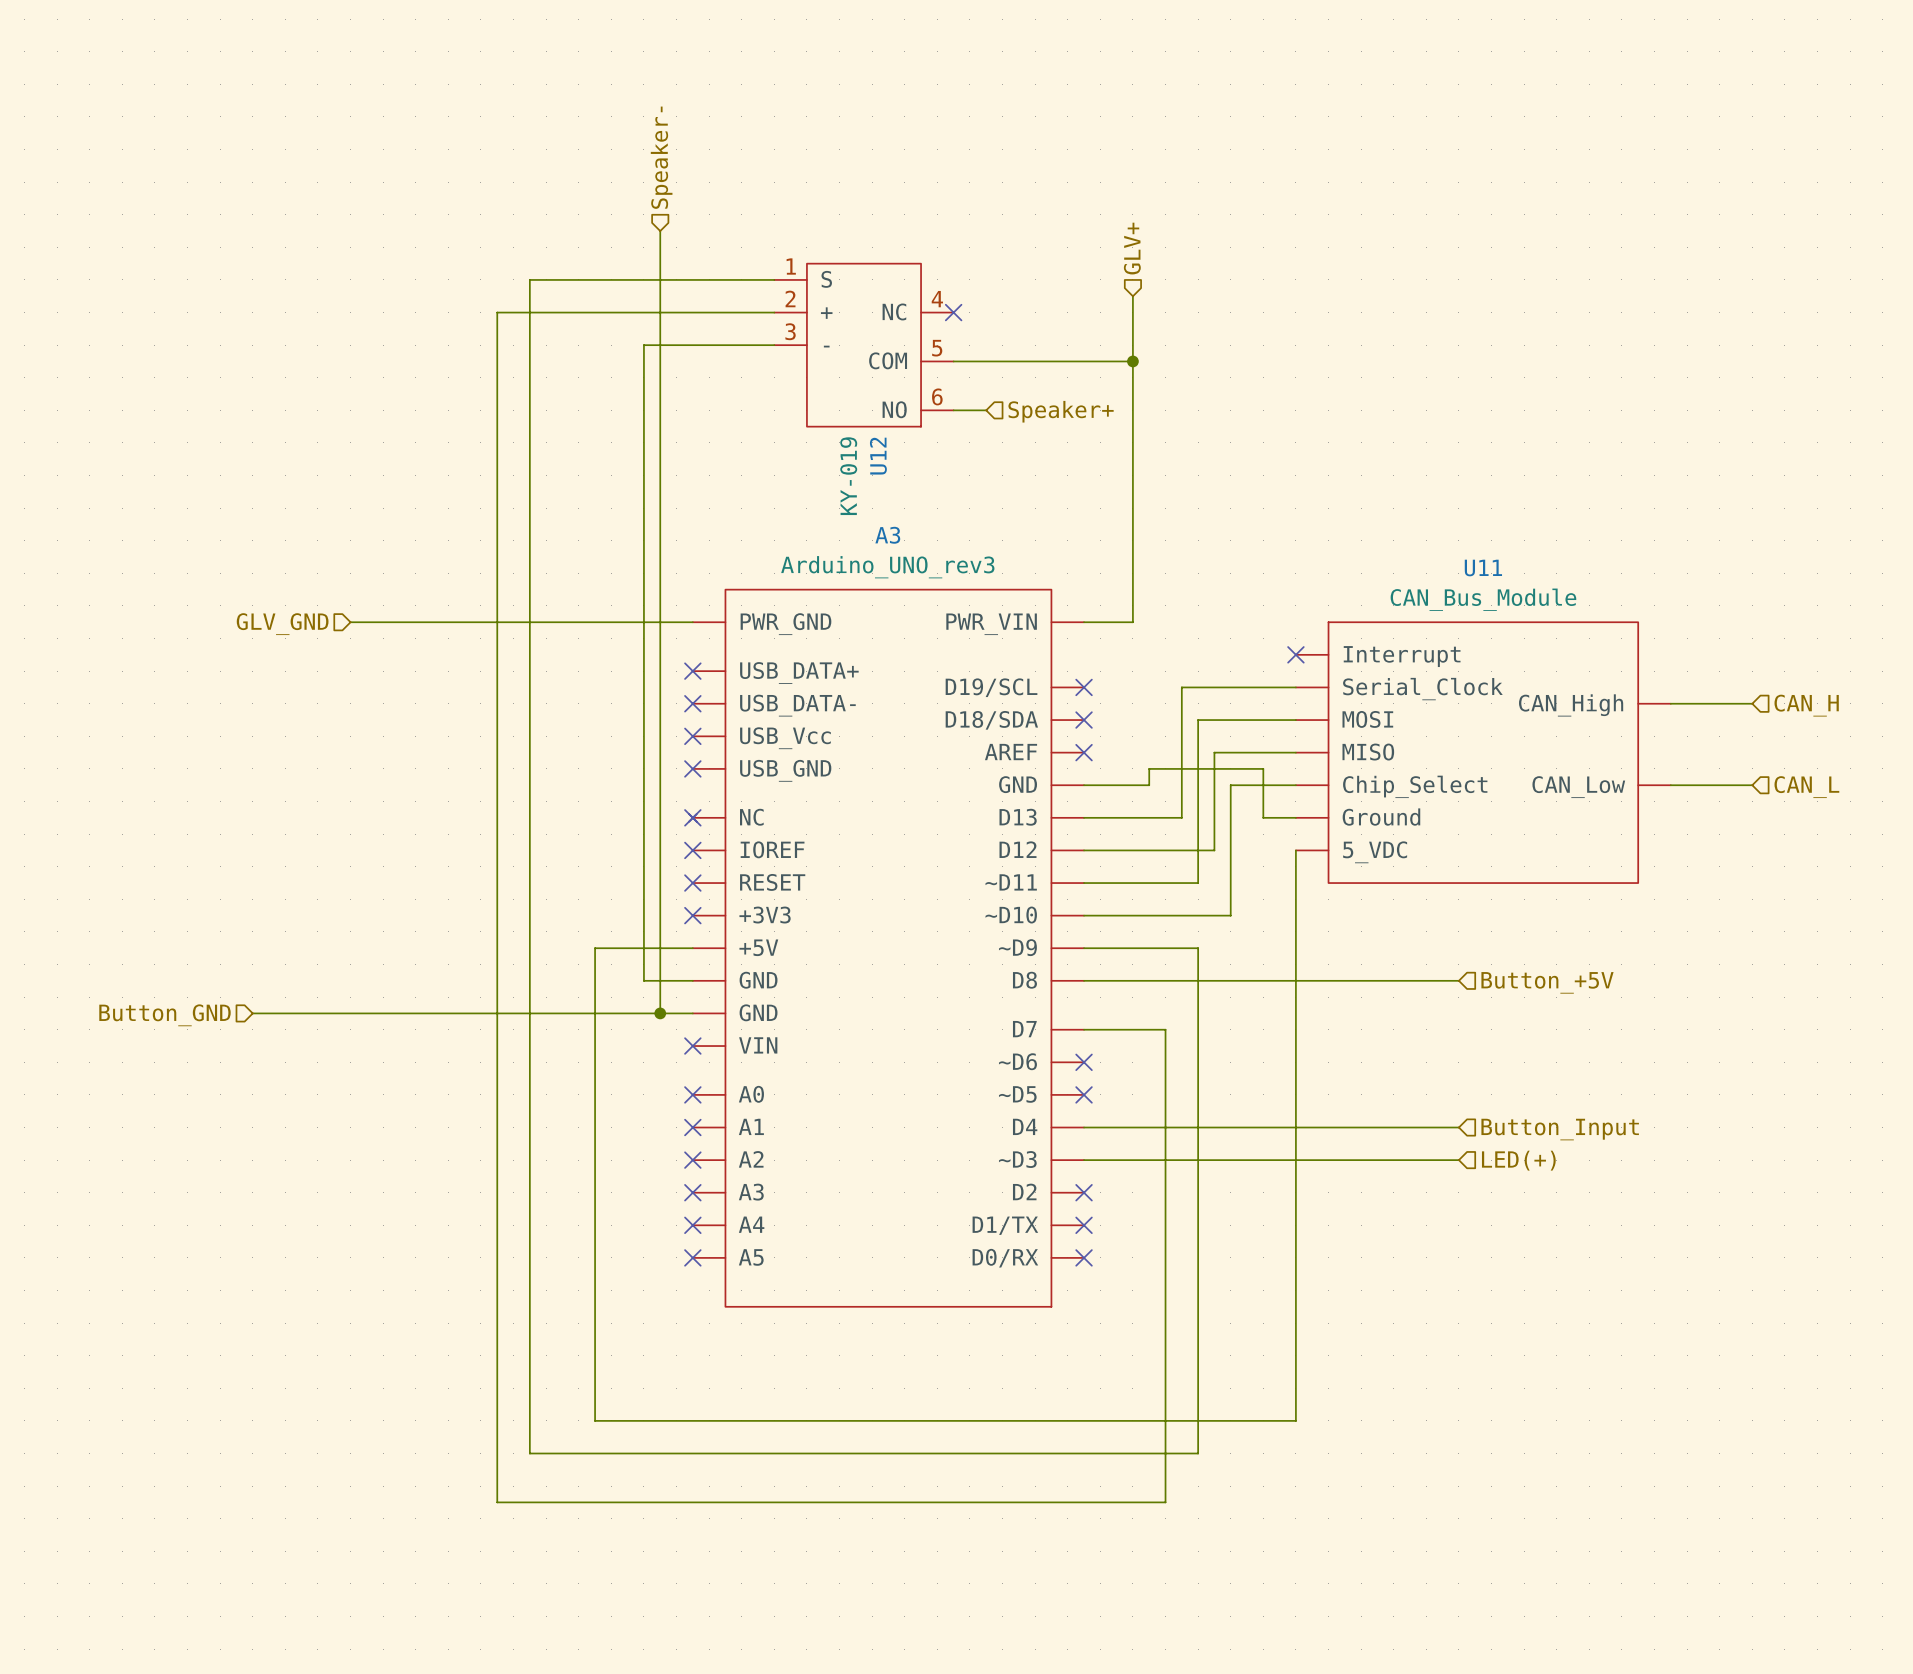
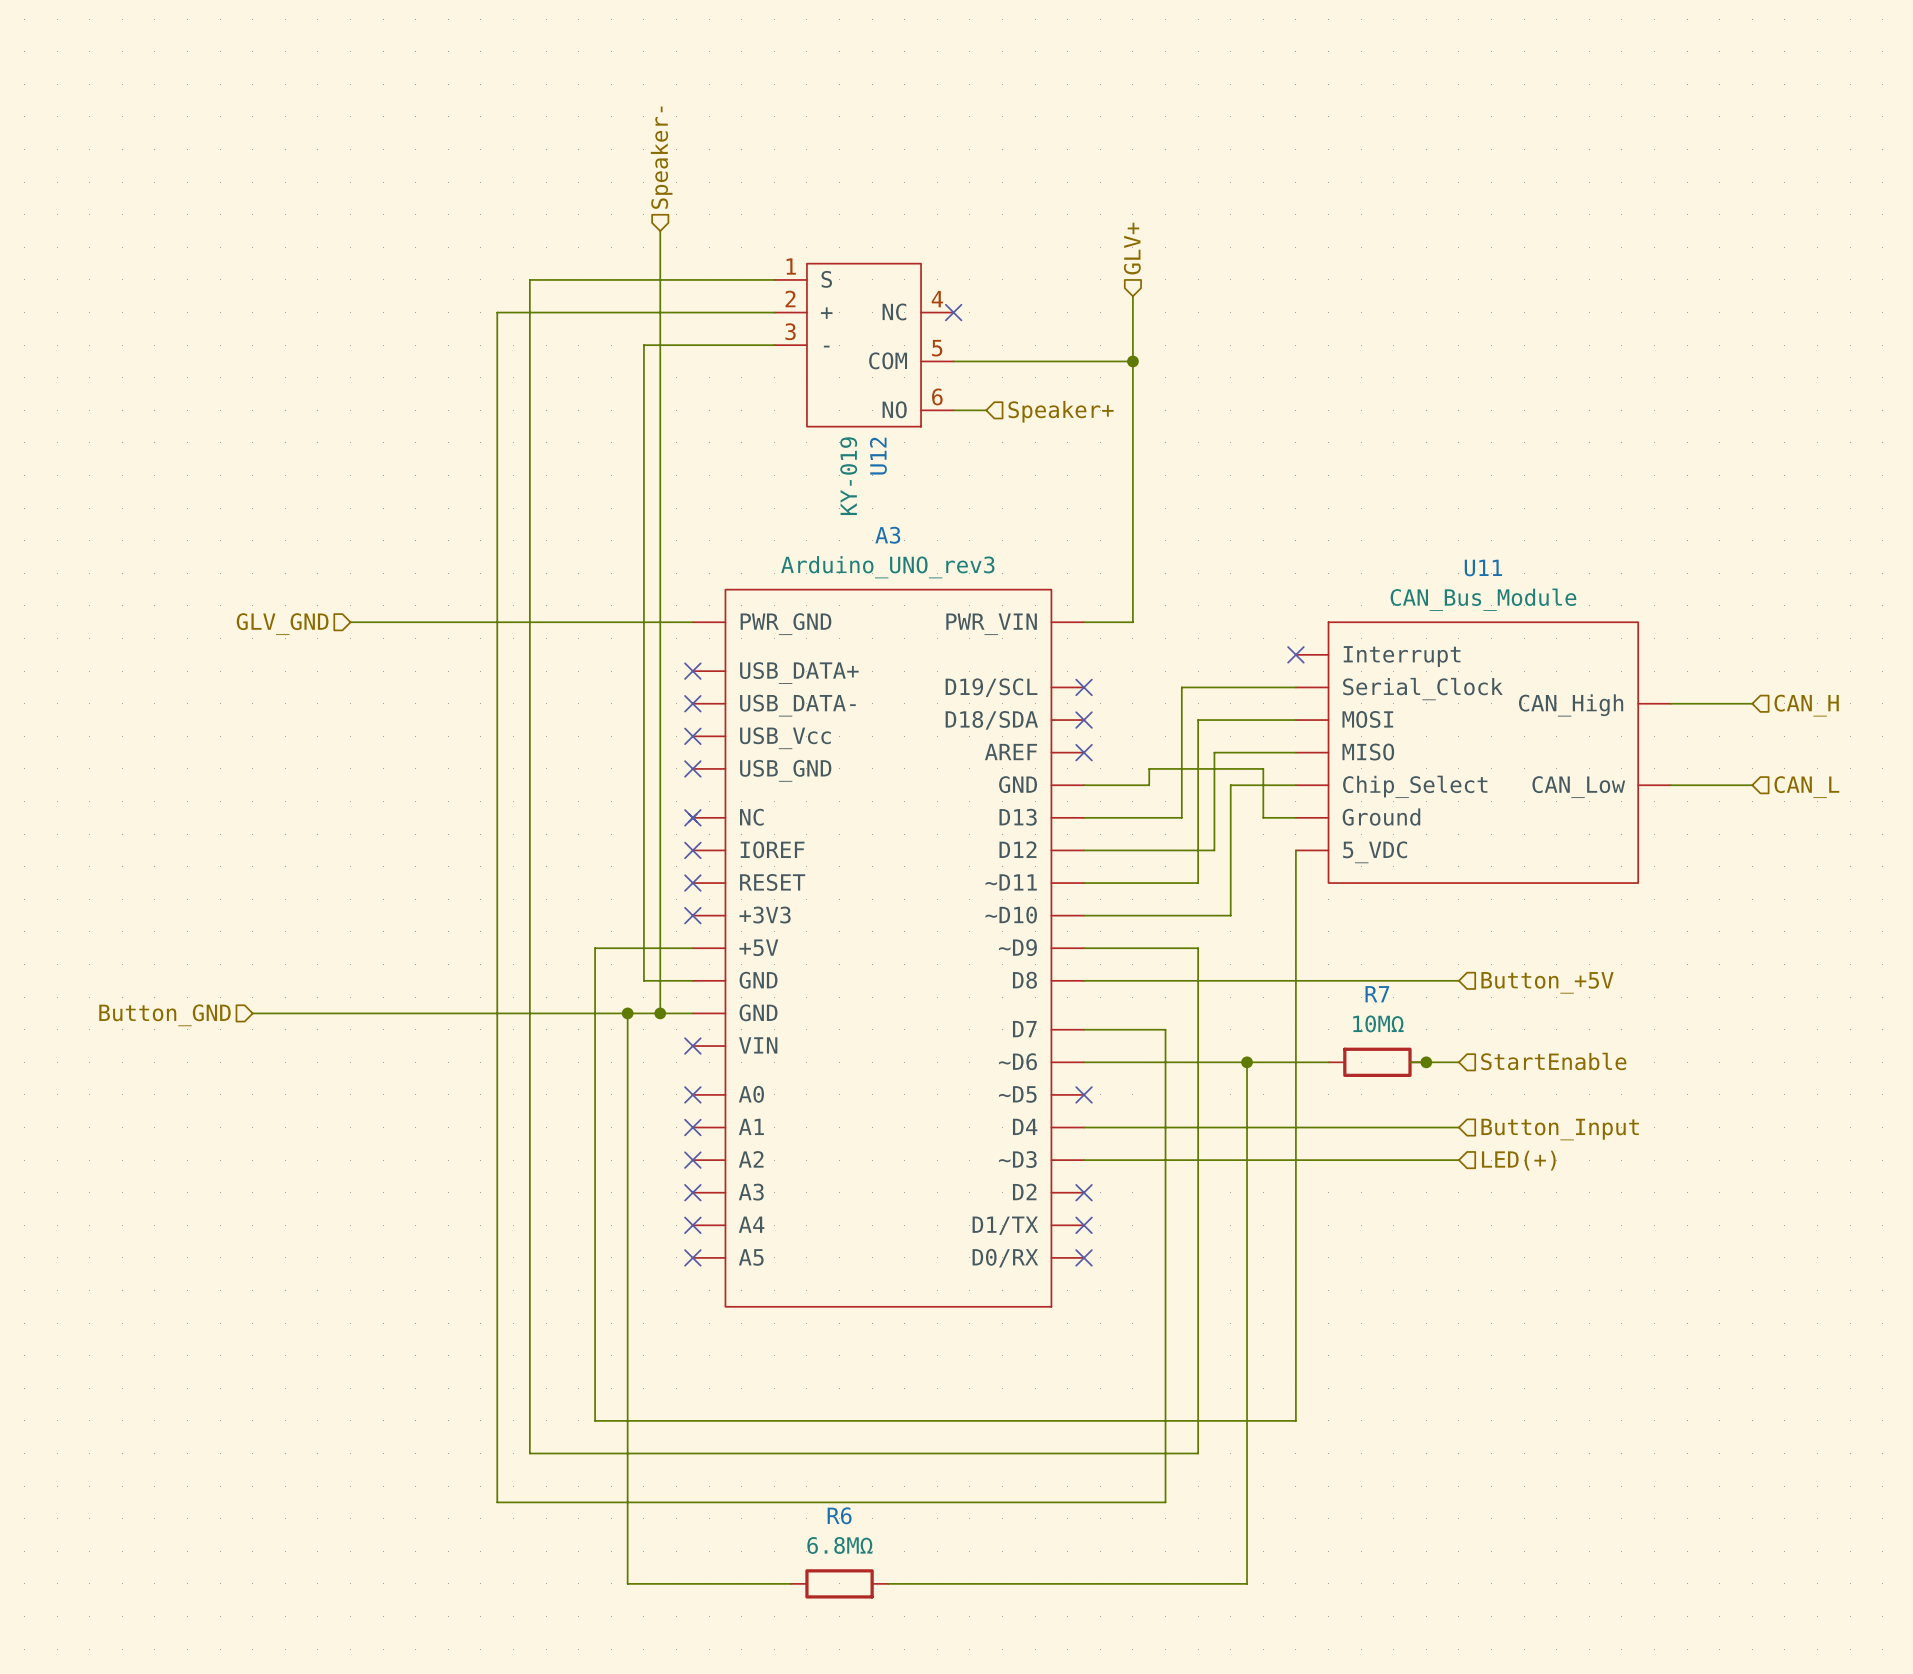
wire: none -> (627, 1013) (627, 1583) (790, 1583)
junction: none -> (627, 1013)
hierarchical label: none -> StartEnable (1553, 1061)
wire: none -> (1084, 1062) (1328, 1062)
no-connect mark: (1084, 1062) -> none
wire: none -> (1247, 1062) (1247, 1583) (888, 1583)
junction: none -> (1247, 1062)
R7: none -> 10MΩ (1377, 1062)
wire: none -> (1410, 1062) (1458, 1062)
junction: none -> (1426, 1062)
R6: none -> 6.8MΩ (839, 1583)

